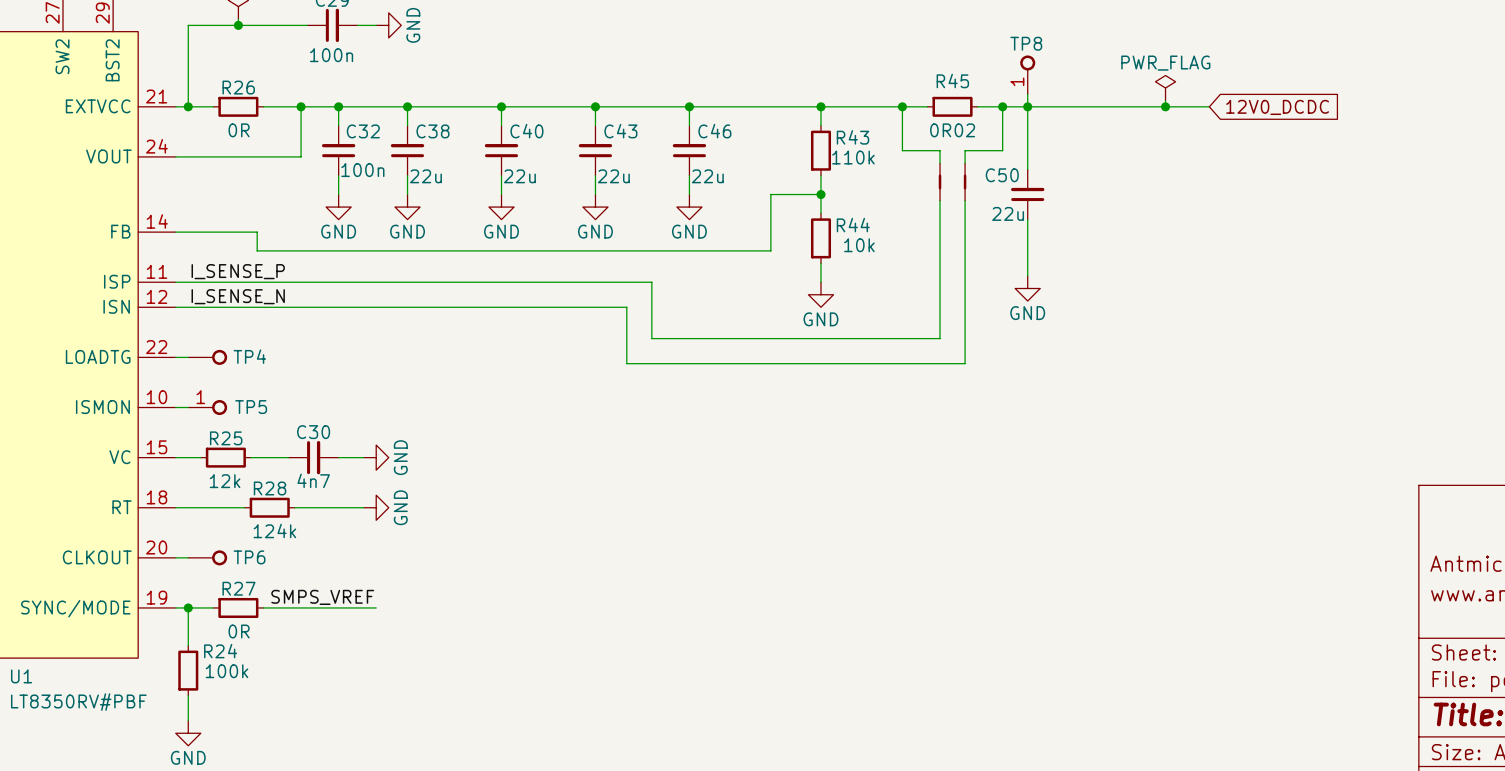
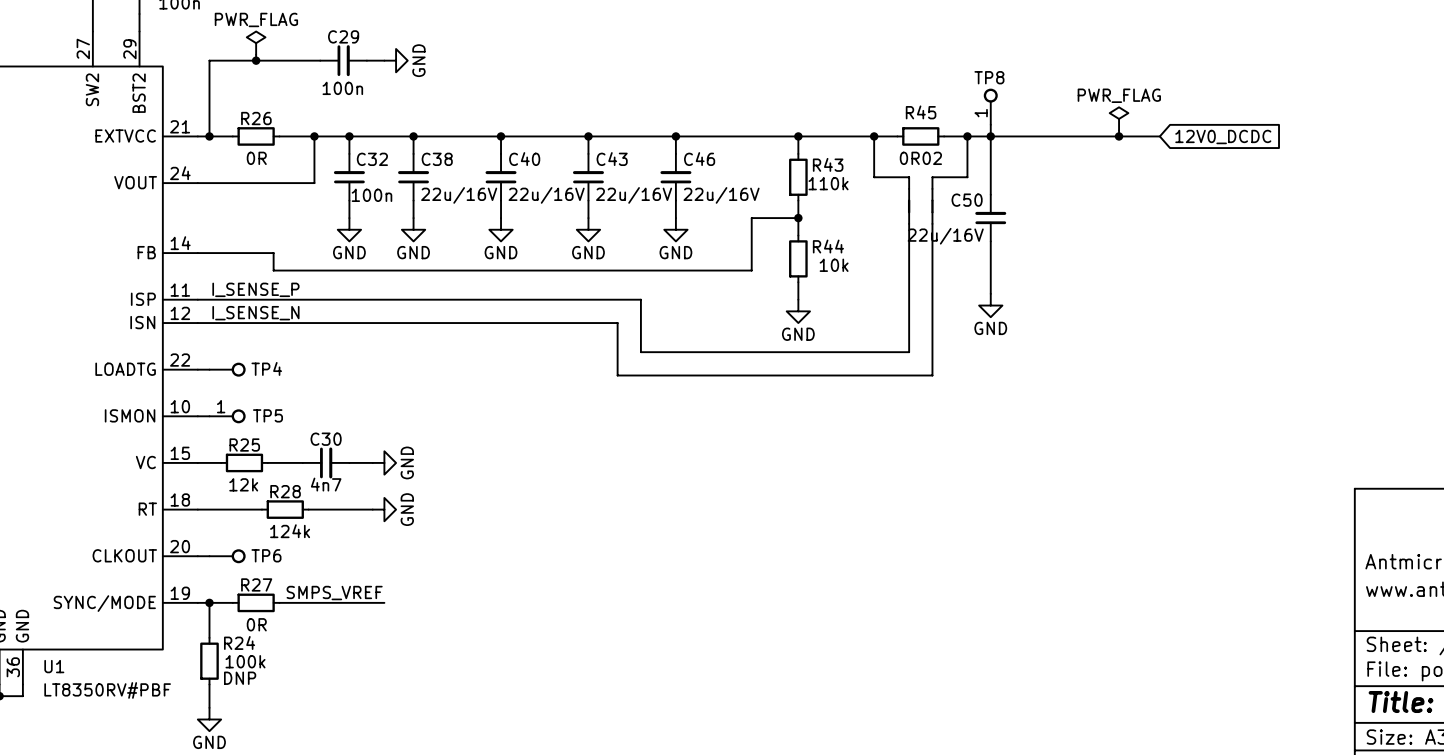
C38 text: 22u (425, 176) -> 22u/16V (459, 195)
C40 text: 22u (519, 176) -> 22u/16V (546, 195)
C43 text: 22u (613, 176) -> 22u/16V (634, 195)
C46 text: 22u (707, 176) -> 22u/16V (721, 195)
C50 text: 22u (1008, 213) -> 22u/16V (945, 236)
R24 text: none -> DNP (240, 678)

